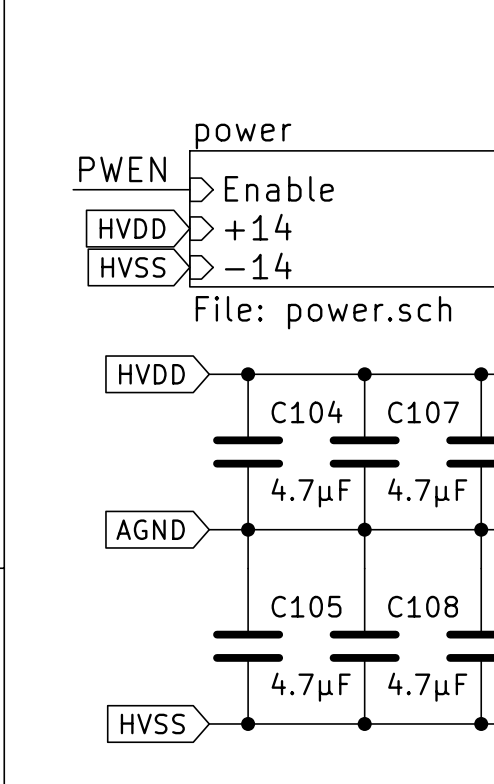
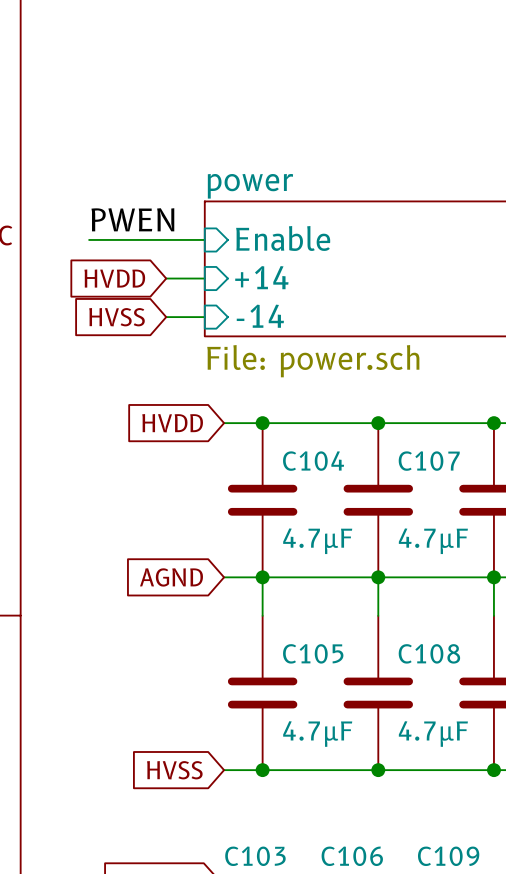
global label position: HVDD (132, 228) -> HVDD (114, 278)
wire: none -> (166, 278) (204, 278)
global label position: HVSS (133, 267) -> HVSS (116, 317)
wire: none -> (166, 317) (204, 317)

